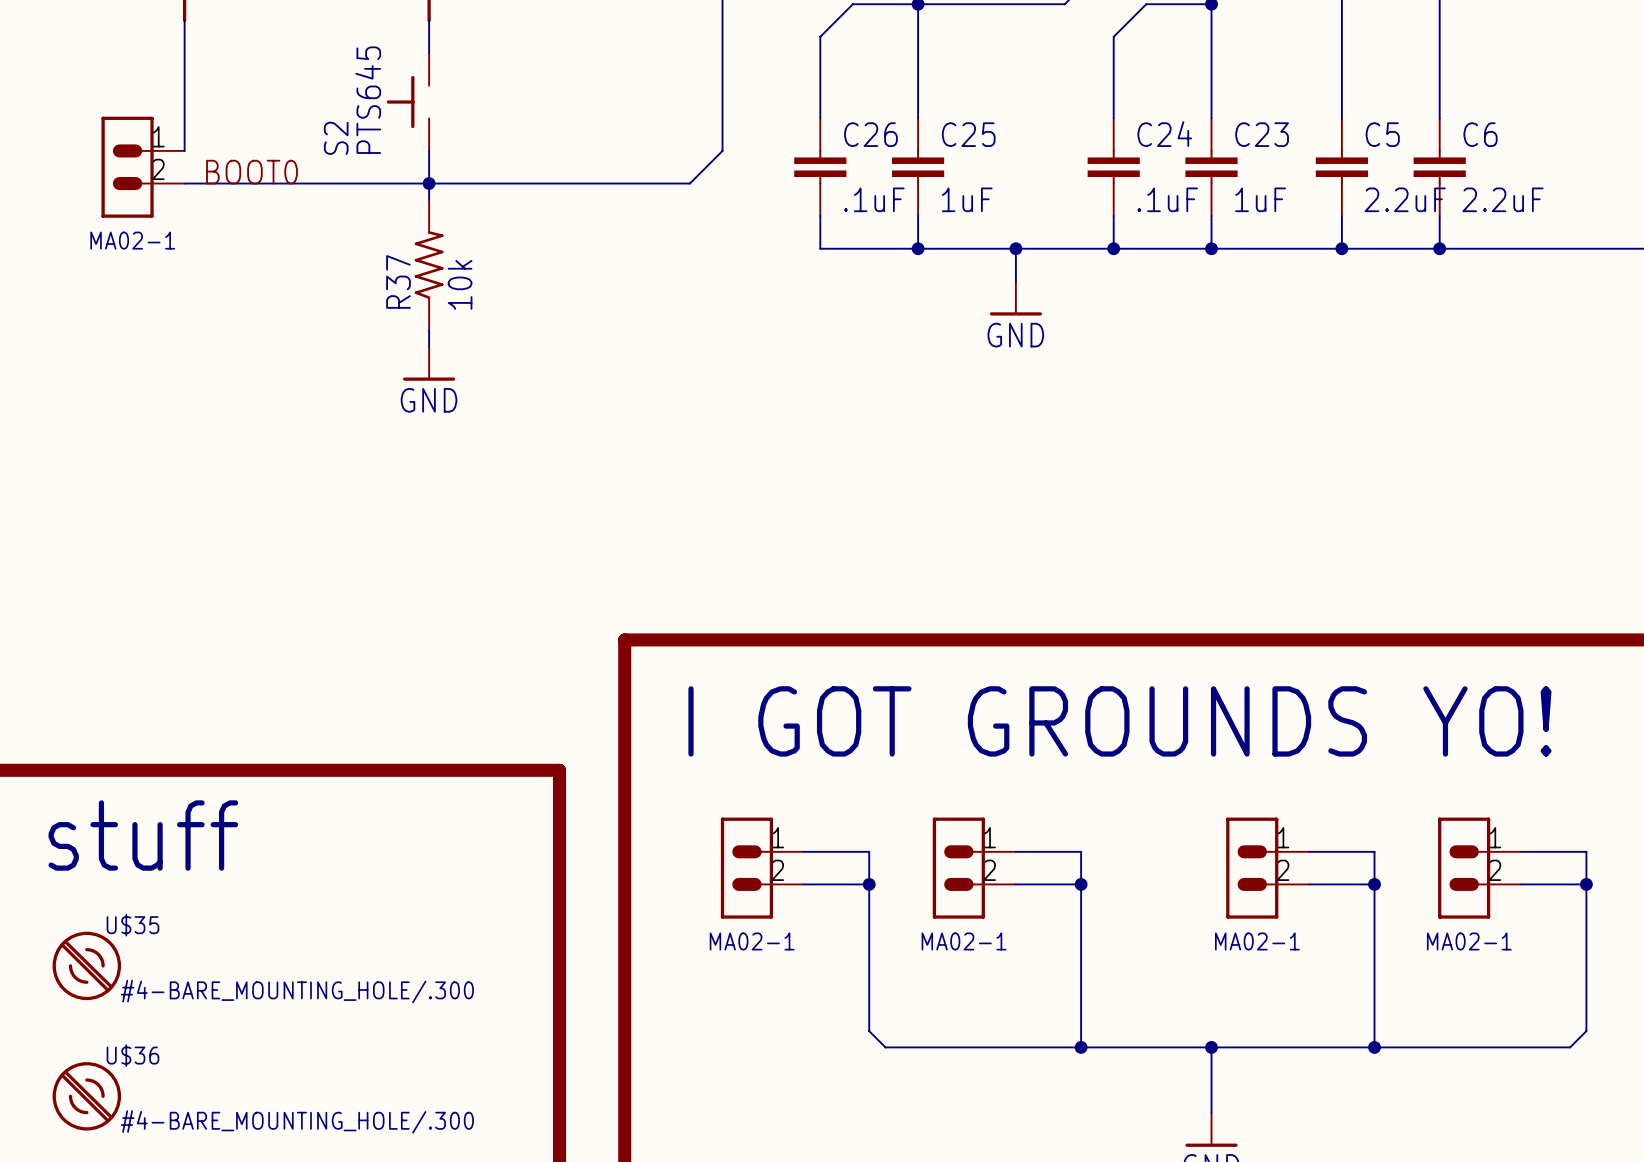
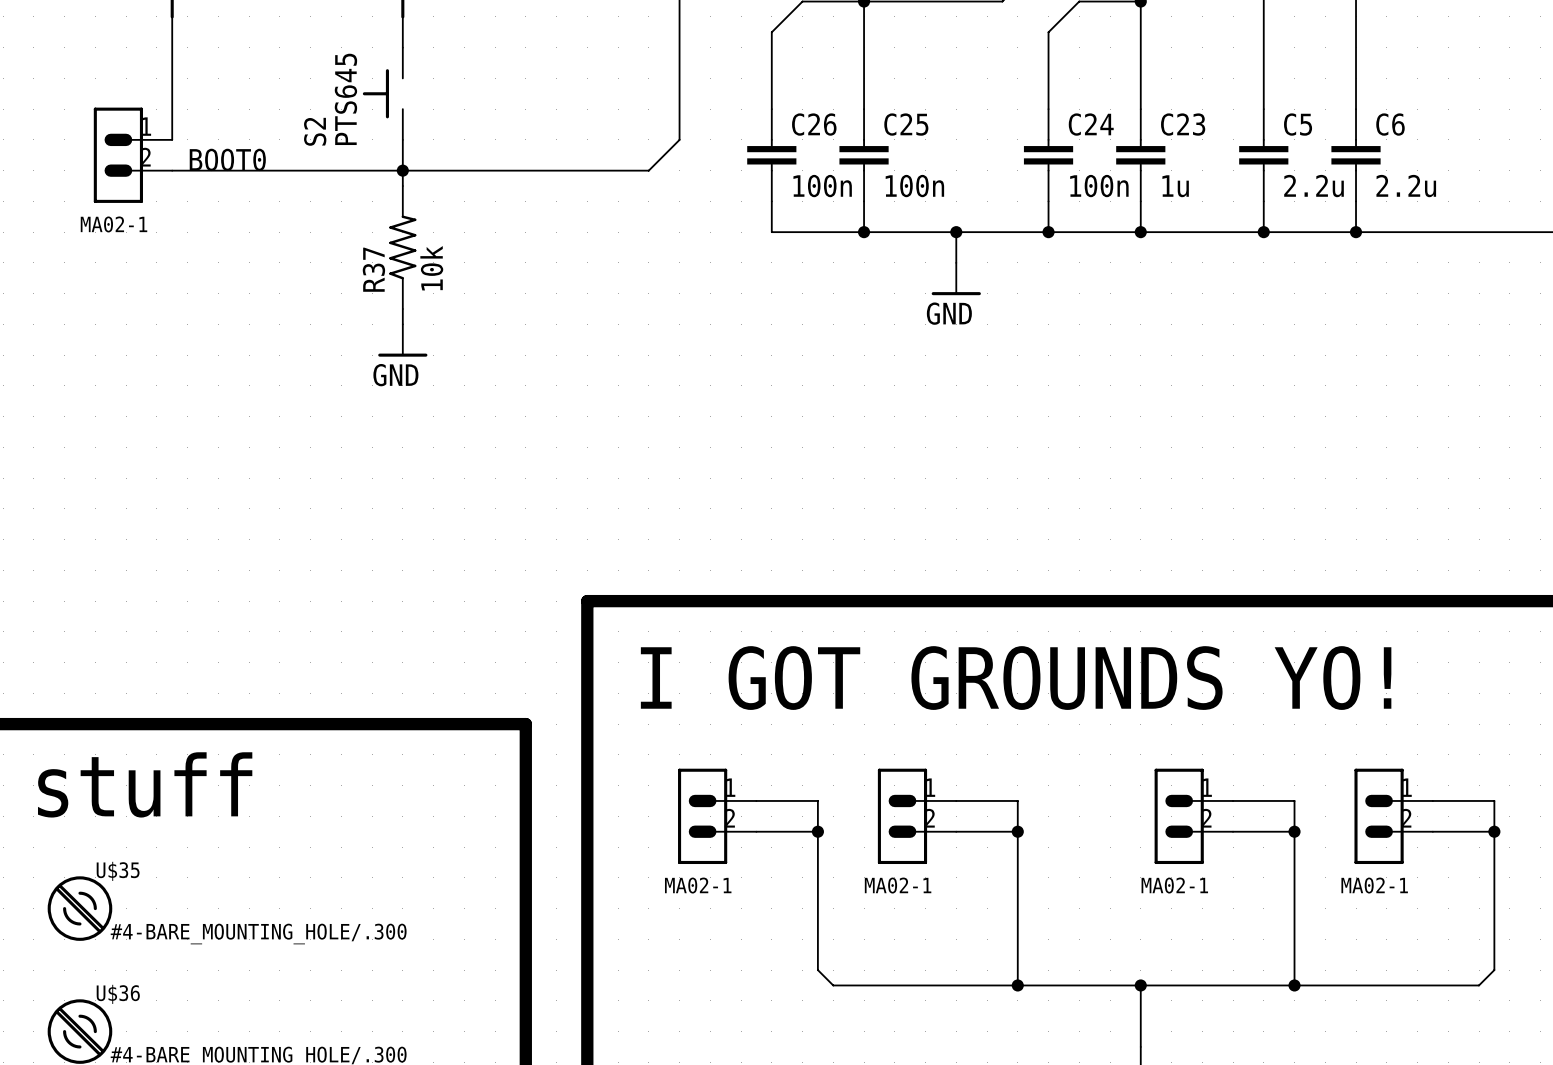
C26 value: .1uF (874, 199) -> 100n (822, 186)
C25 value: 1uF (967, 199) -> 100n (914, 186)
C24 value: .1uF (1167, 199) -> 100n (1099, 186)
C23 value: 1uF (1260, 199) -> 1u (1175, 186)
C5 value: 2.2uF (1405, 199) -> 2.2u (1314, 186)
C6 value: 2.2uF (1503, 199) -> 2.2u (1406, 186)

